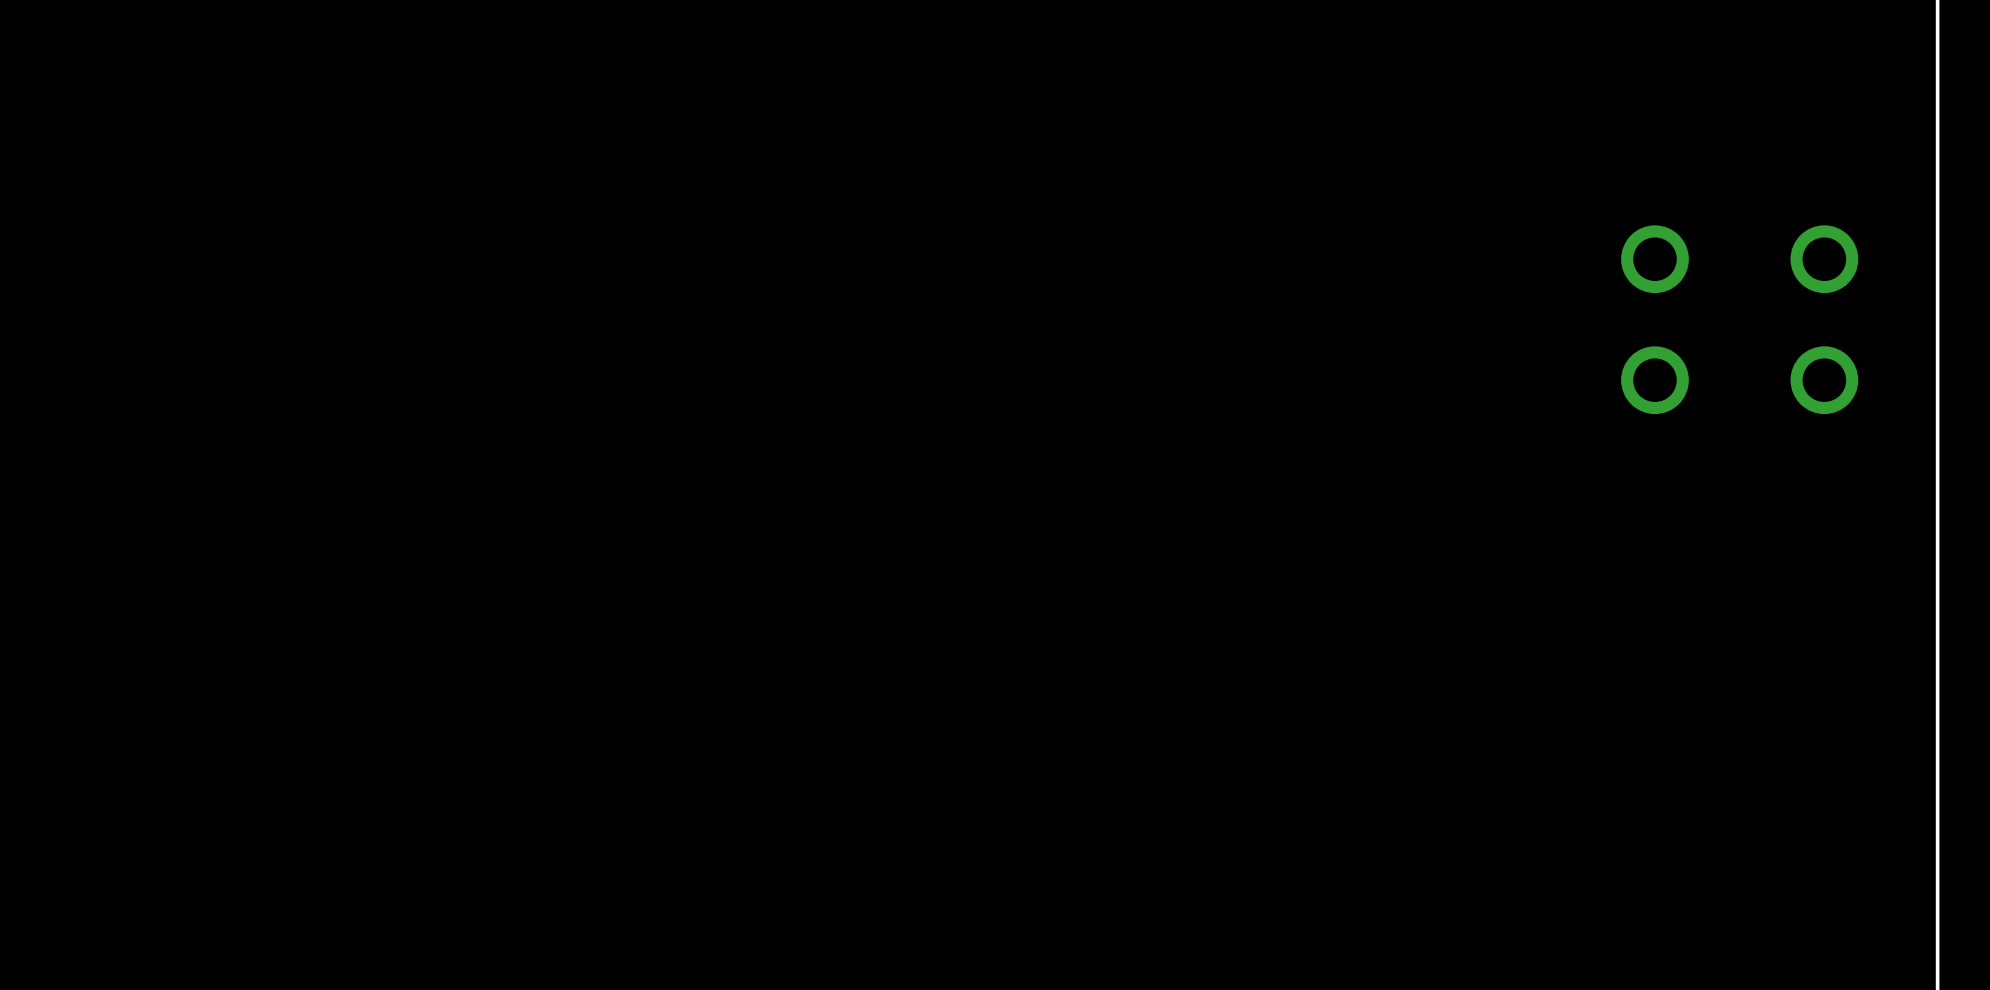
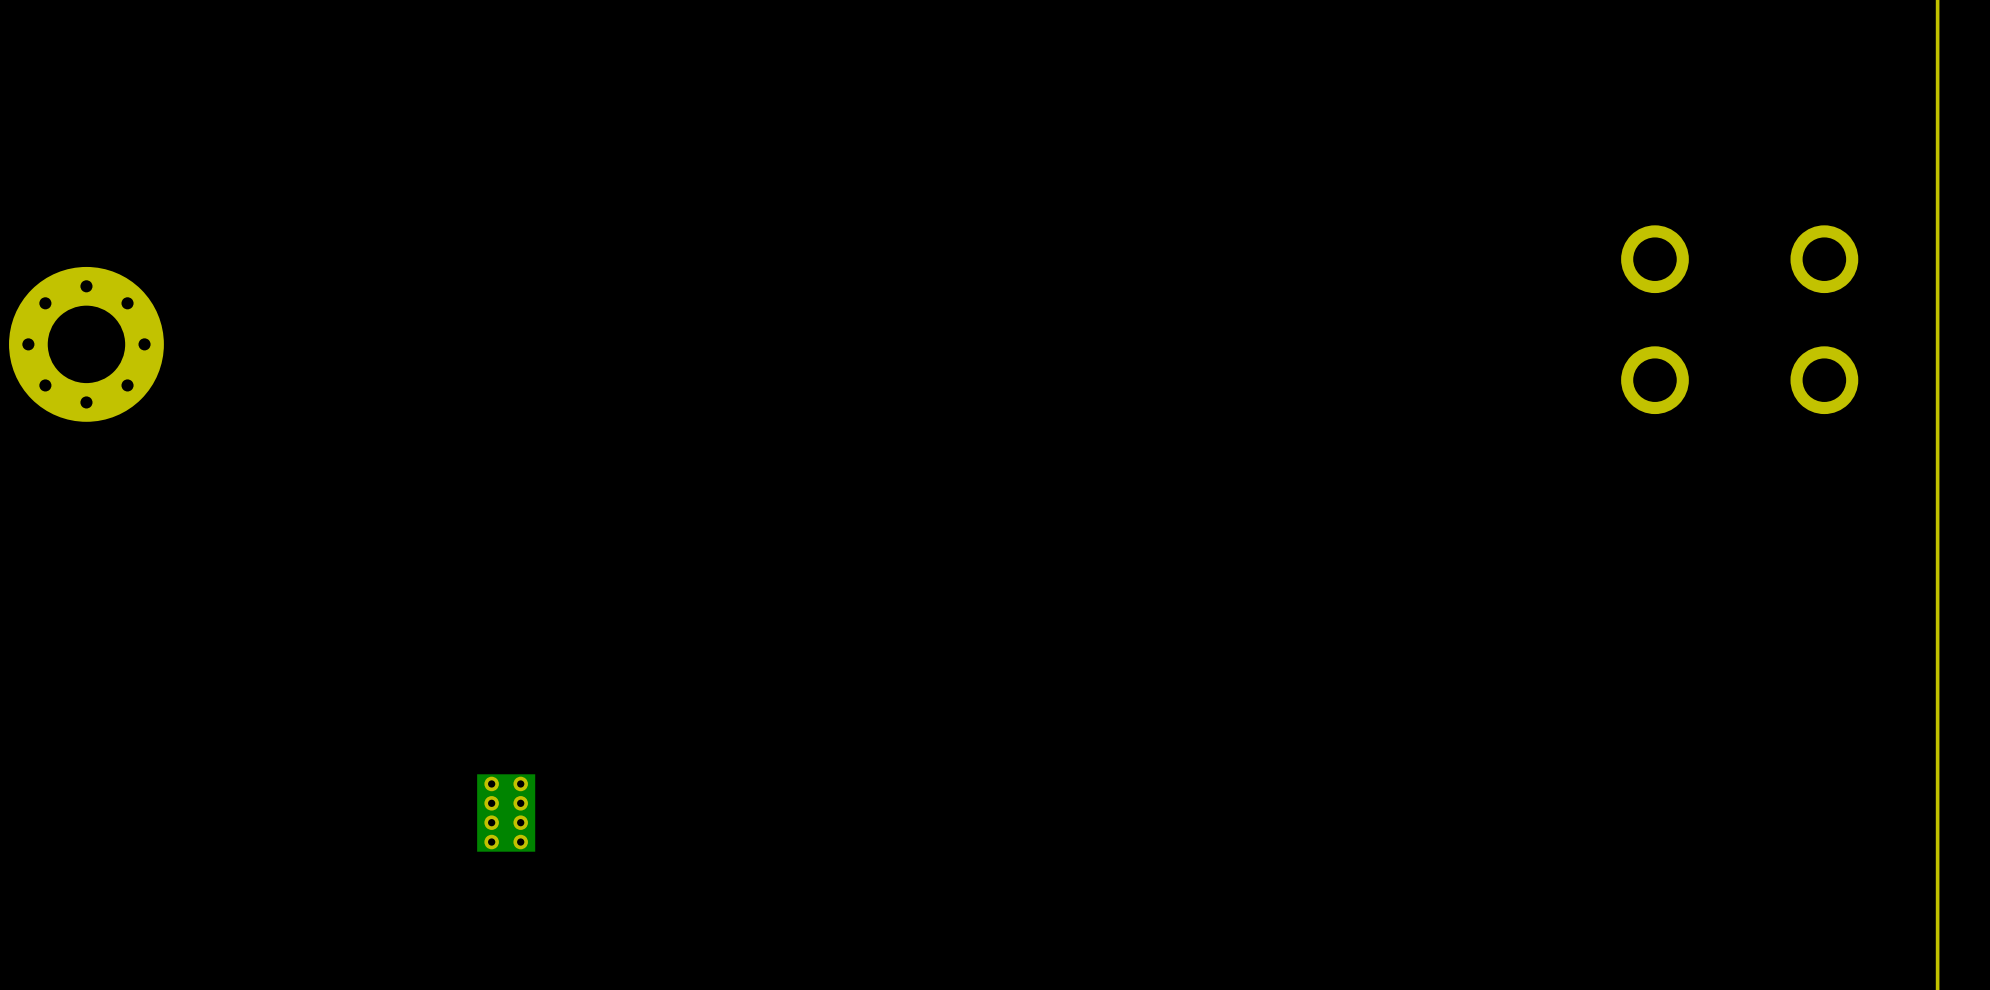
part: none -> (86, 344)
part: none -> (506, 813)

